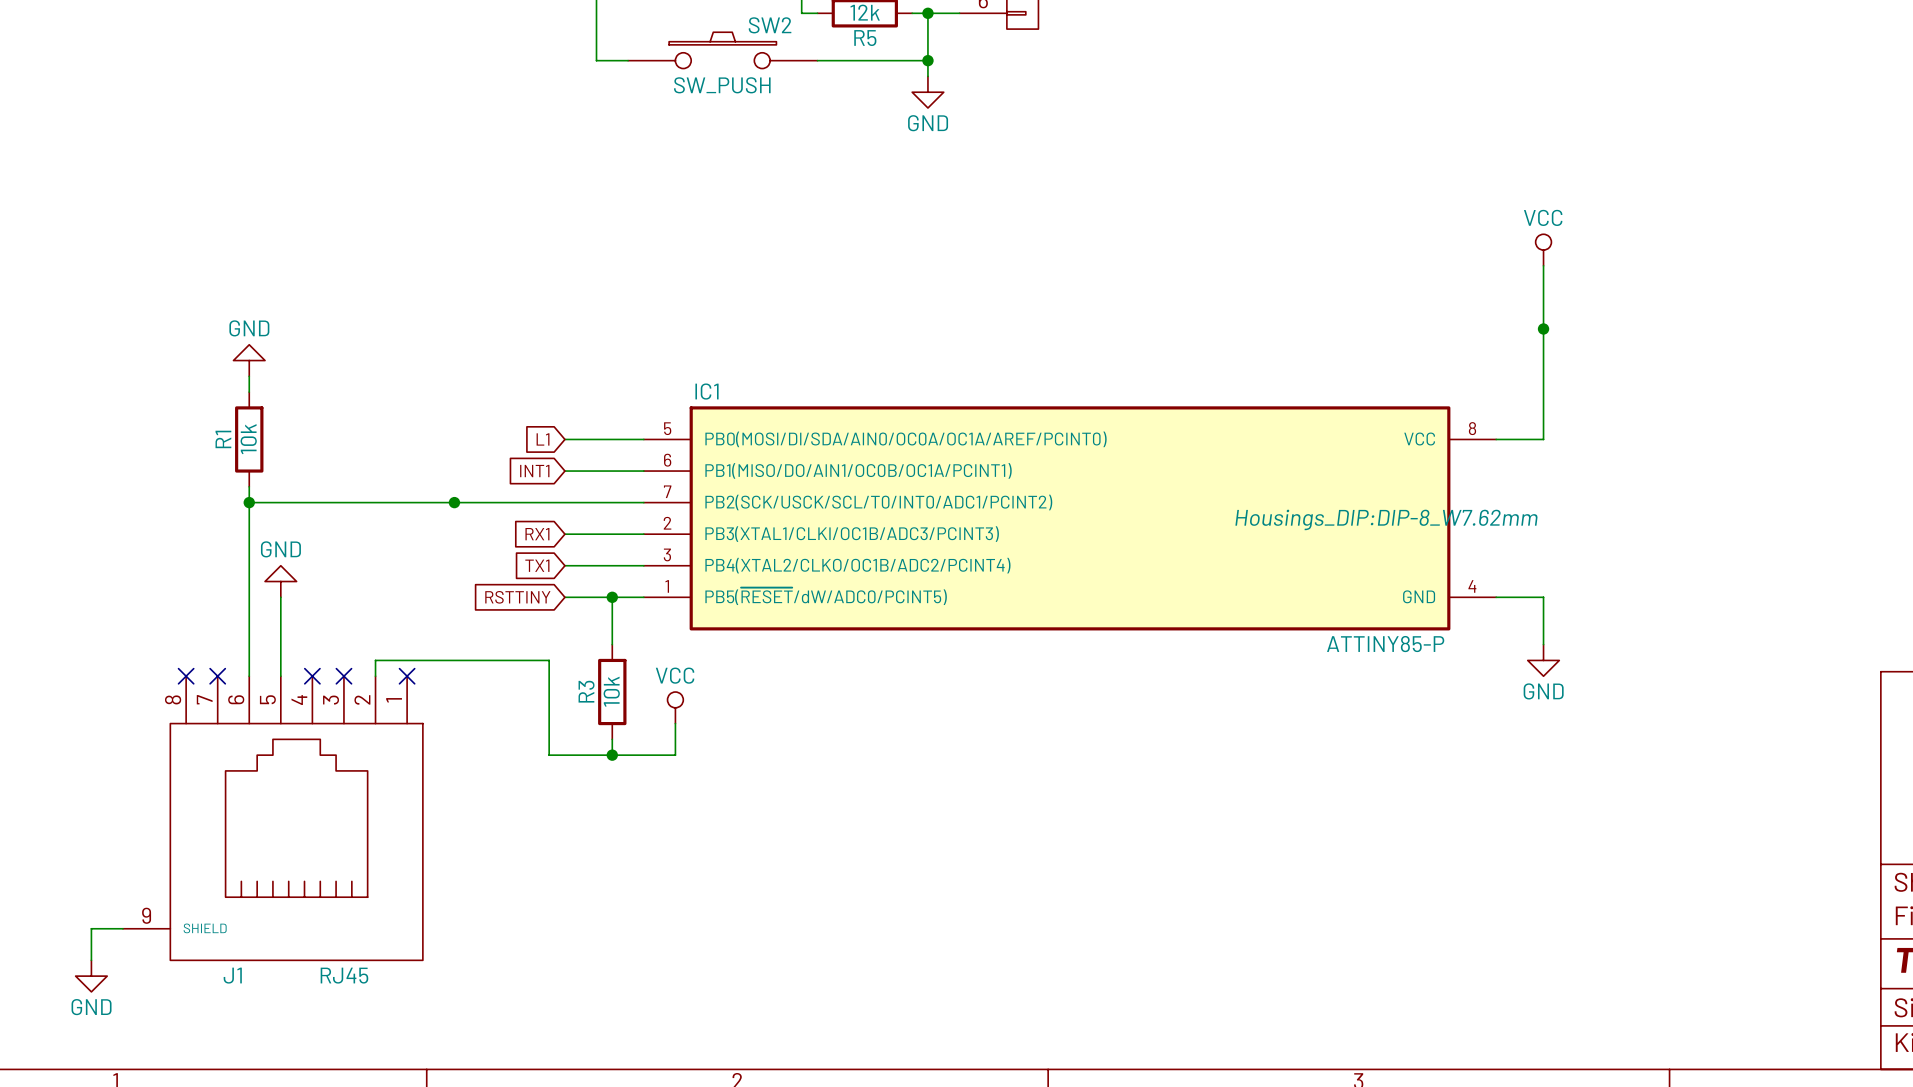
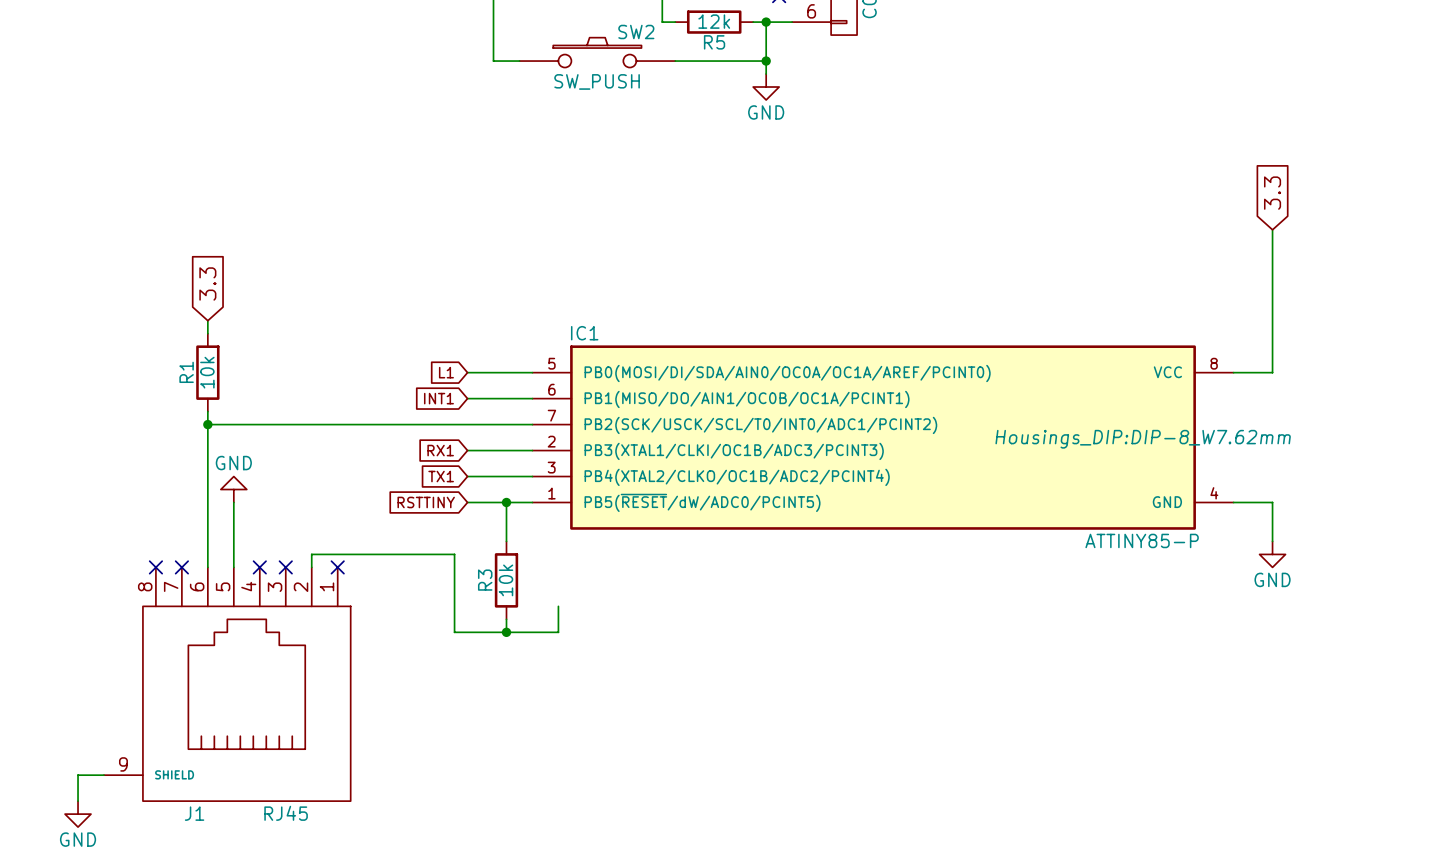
global label: none -> 3.3 (1272, 193)
power symbol: VCC (1543, 250) -> none
junction: (1543, 328) -> none
global label: none -> 3.3 (207, 283)
power symbol: GND (249, 360) -> none
junction: (454, 502) -> none
power symbol: VCC (675, 707) -> none

